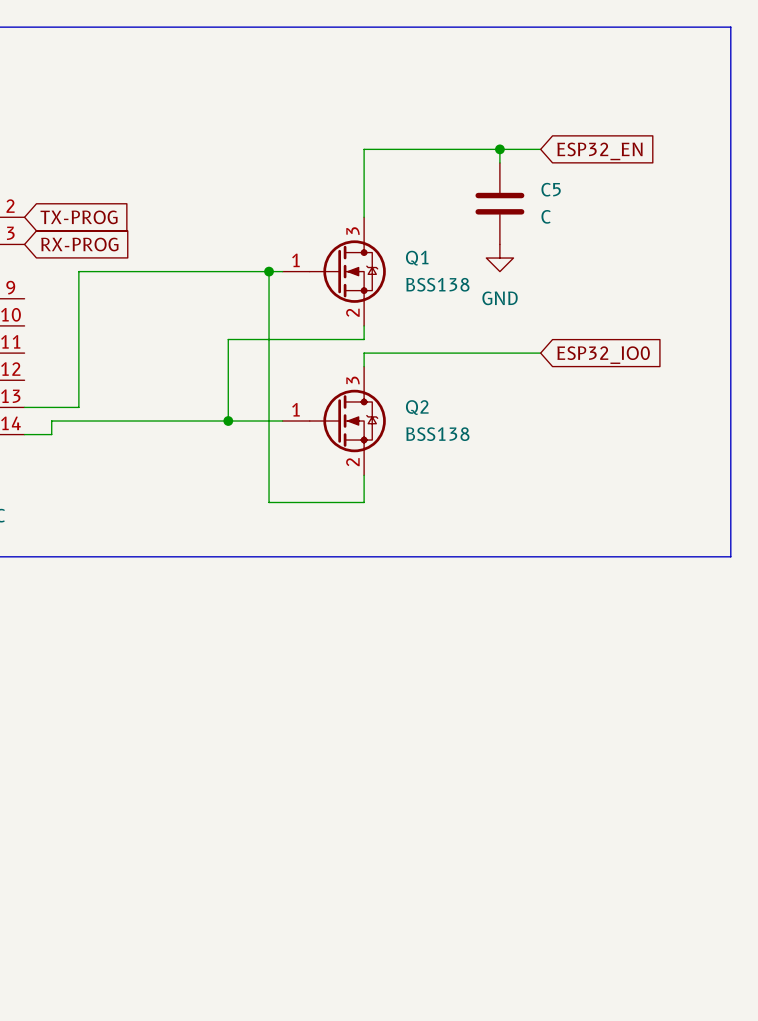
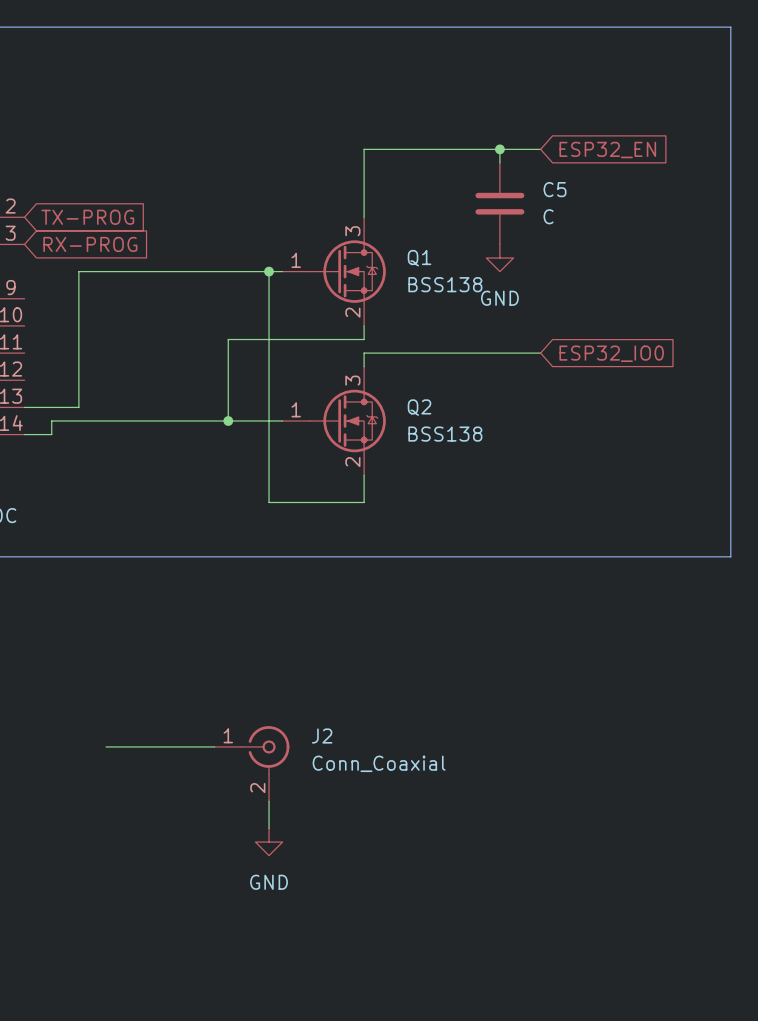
wire: none -> (106, 746) (214, 746)
J2: none -> Conn_Coaxial (252, 763)
wire: none -> (269, 801) (269, 828)
power symbol: none -> GND (269, 842)

